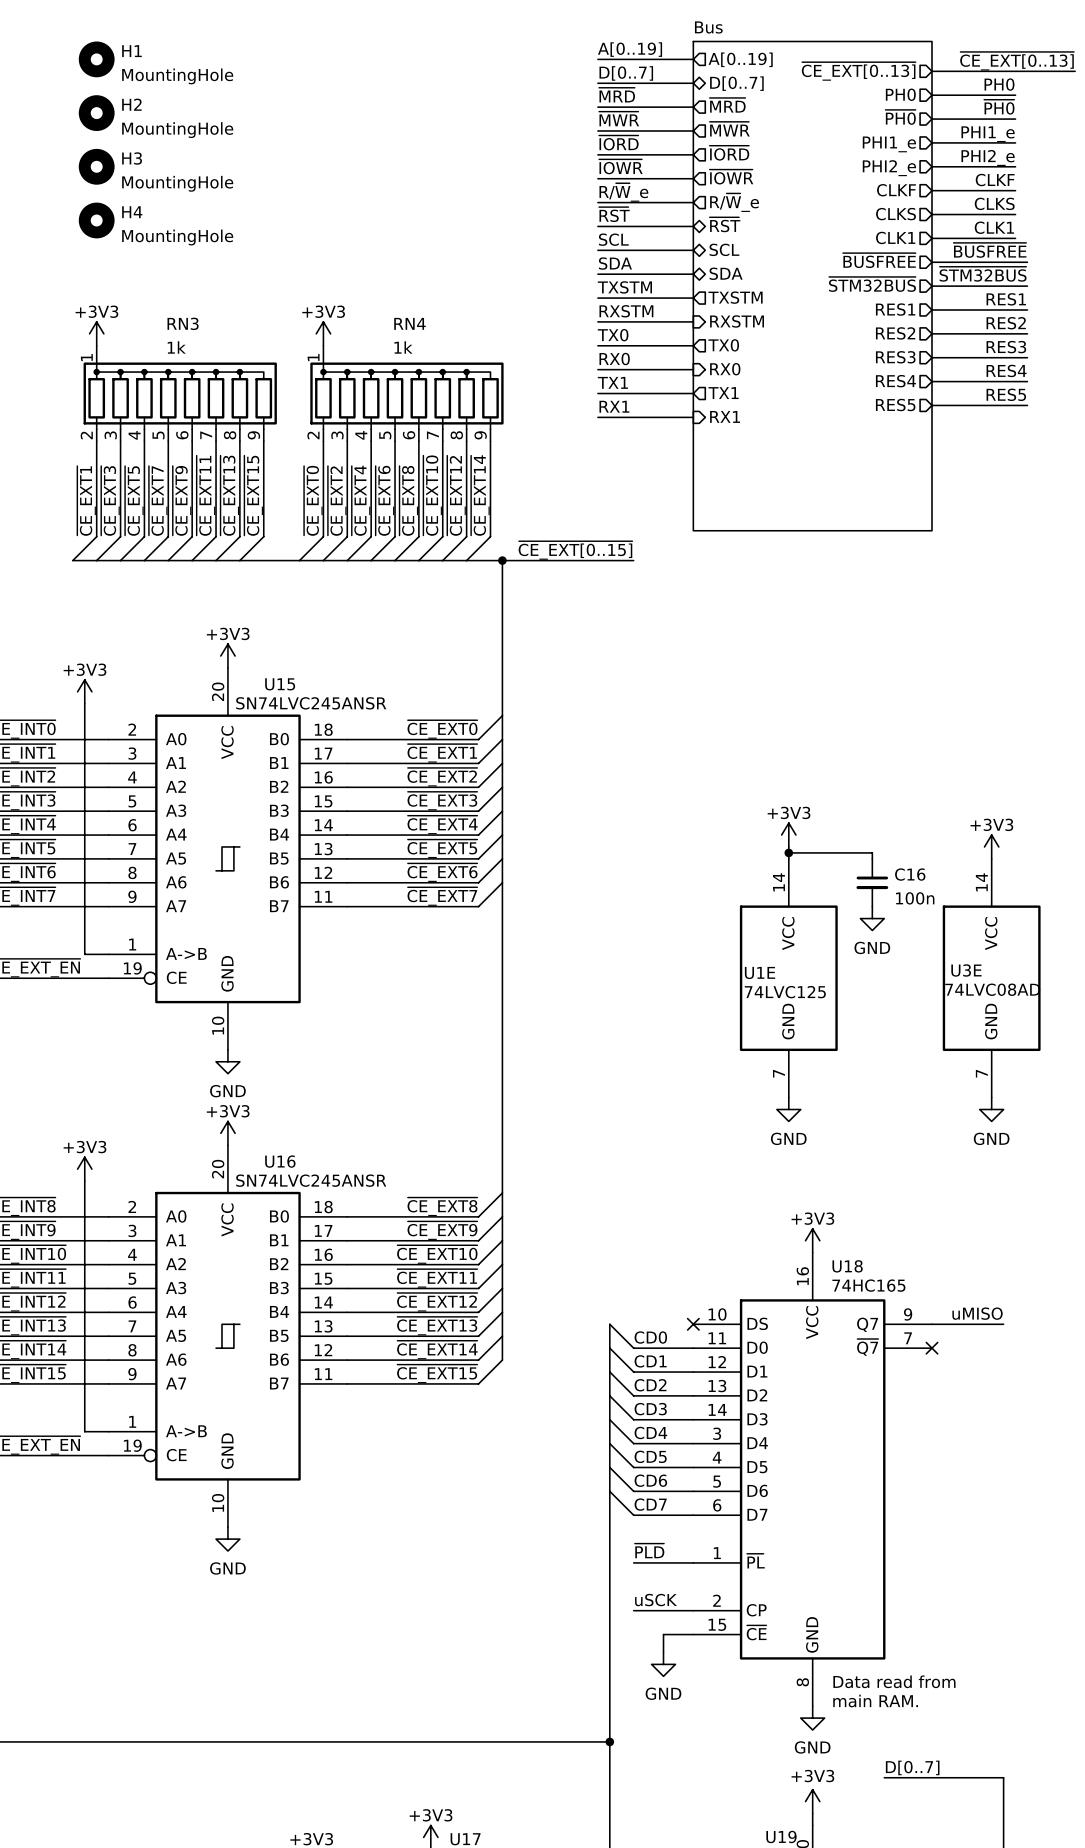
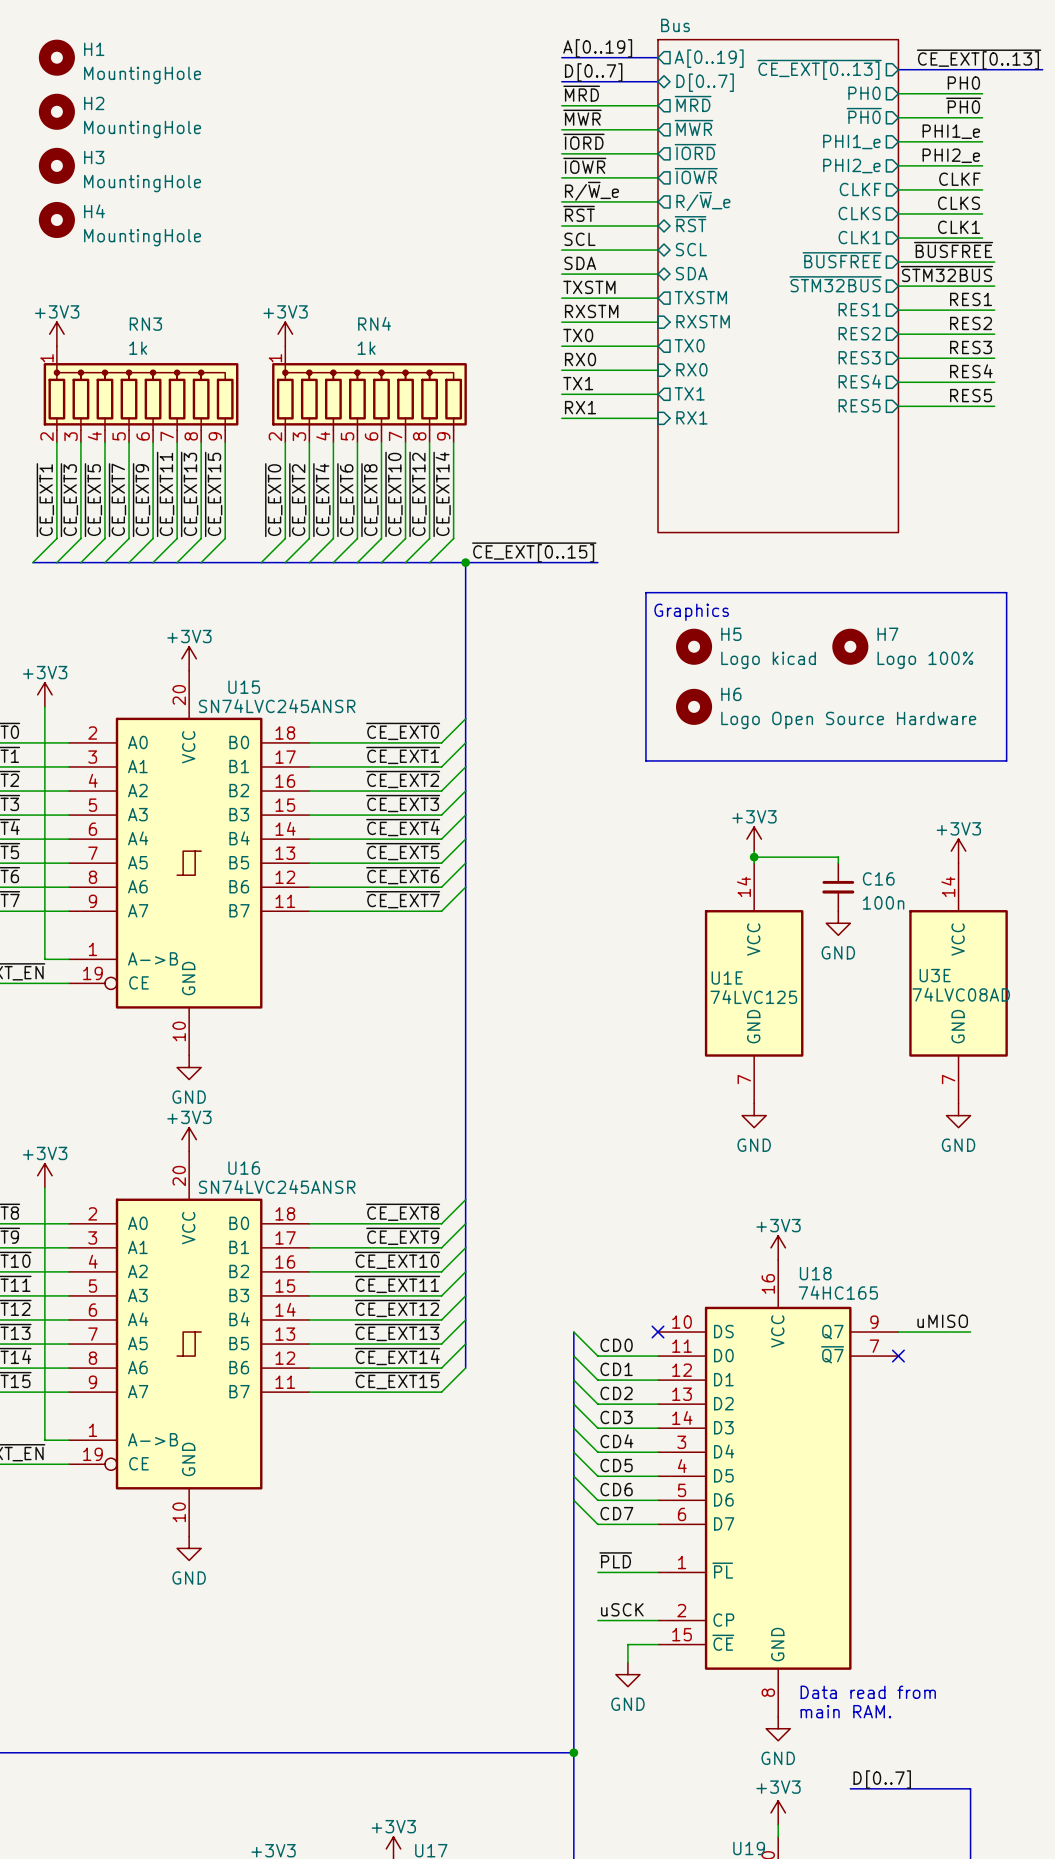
line: none -> (645, 592) (1006, 592) (1006, 760) (645, 760) (645, 592)
text: none -> Graphics (691, 612)
H5: none -> Logo kicad (694, 646)
H7: none -> Logo 100% (850, 646)
H6: none -> Logo Open Source Hardware (694, 706)

